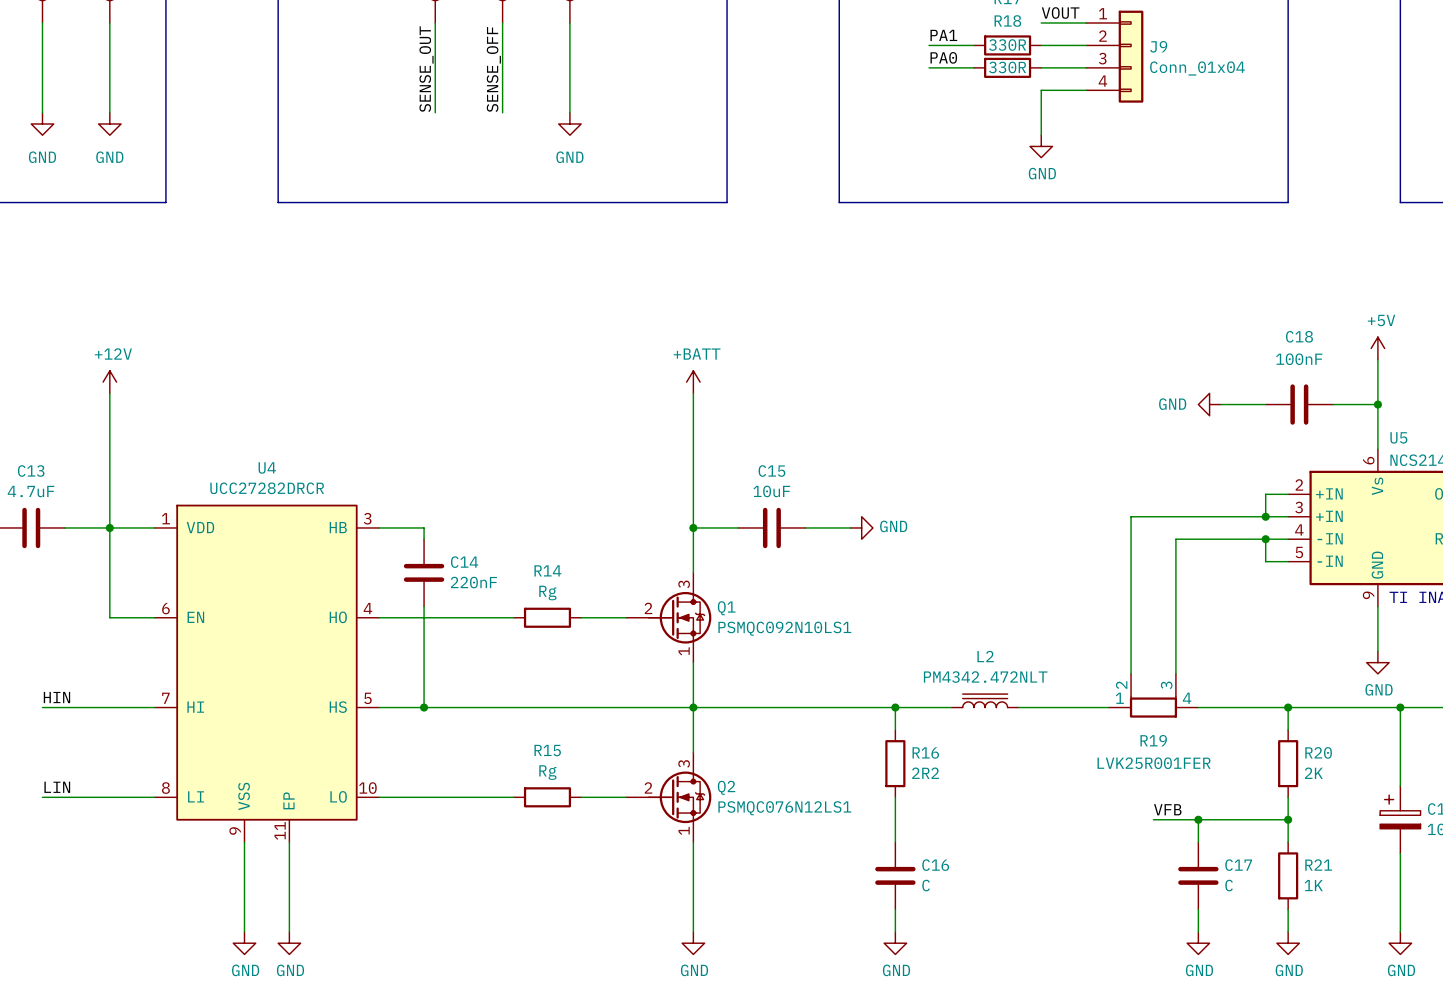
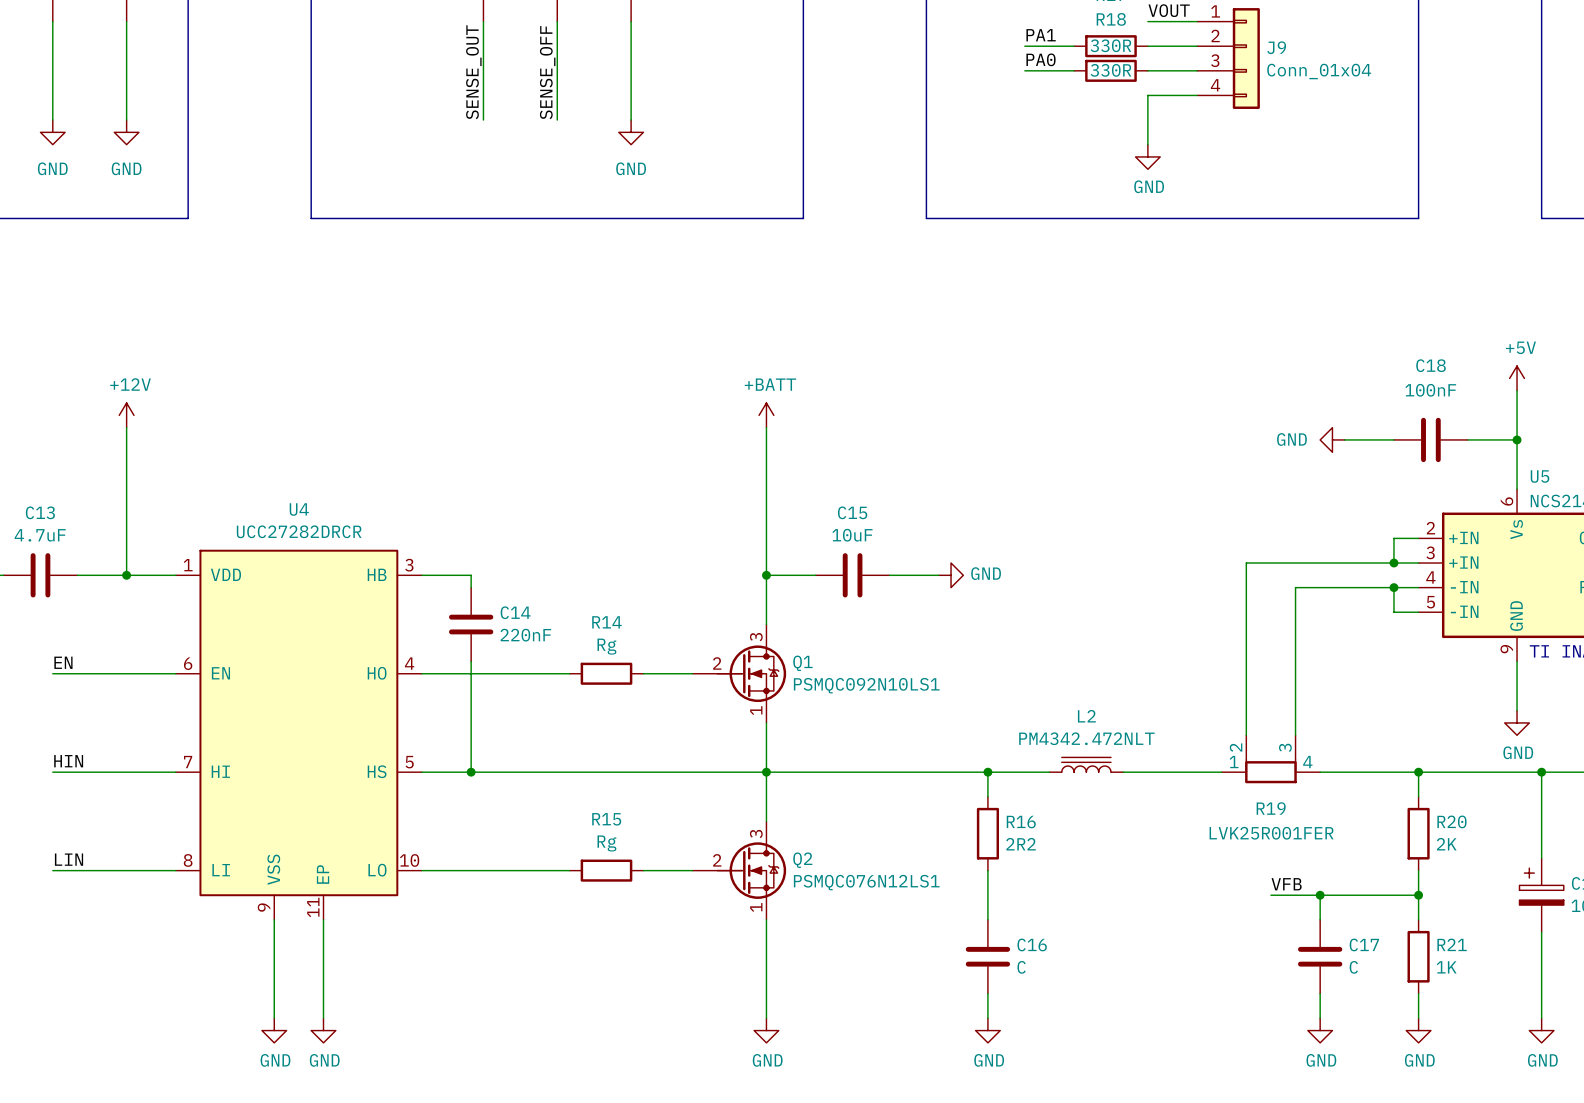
wire: (109, 527) (109, 617) -> (52, 673) (126, 673)
label: none -> EN (63, 662)

